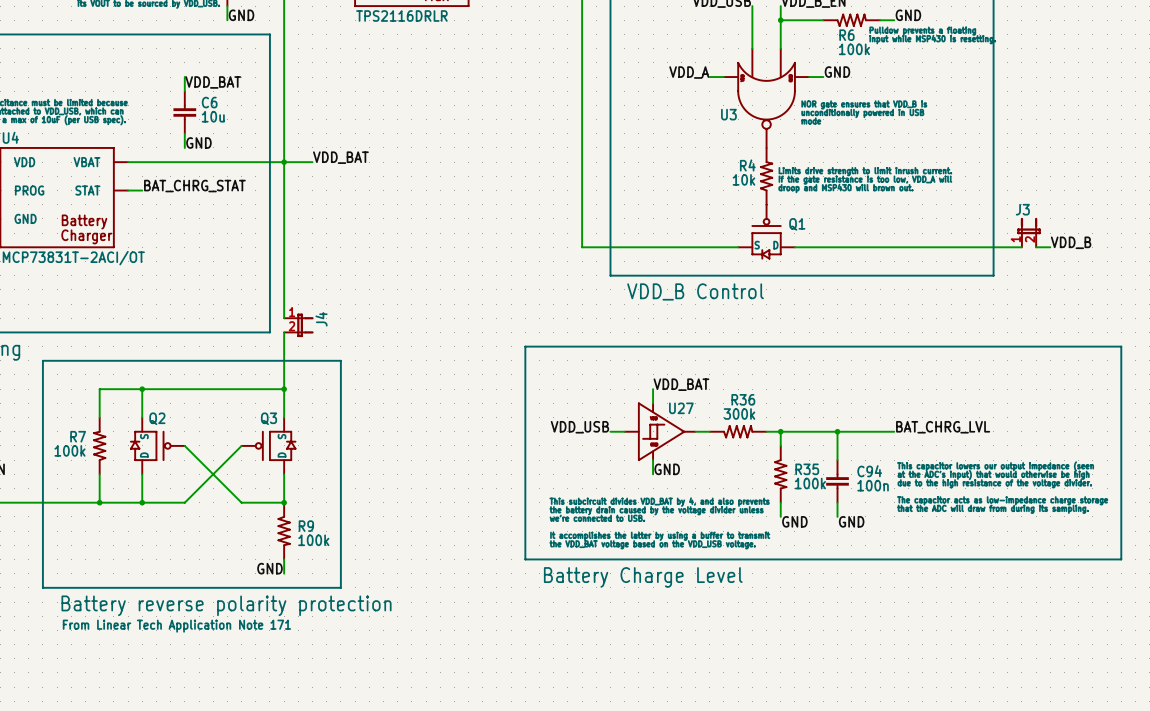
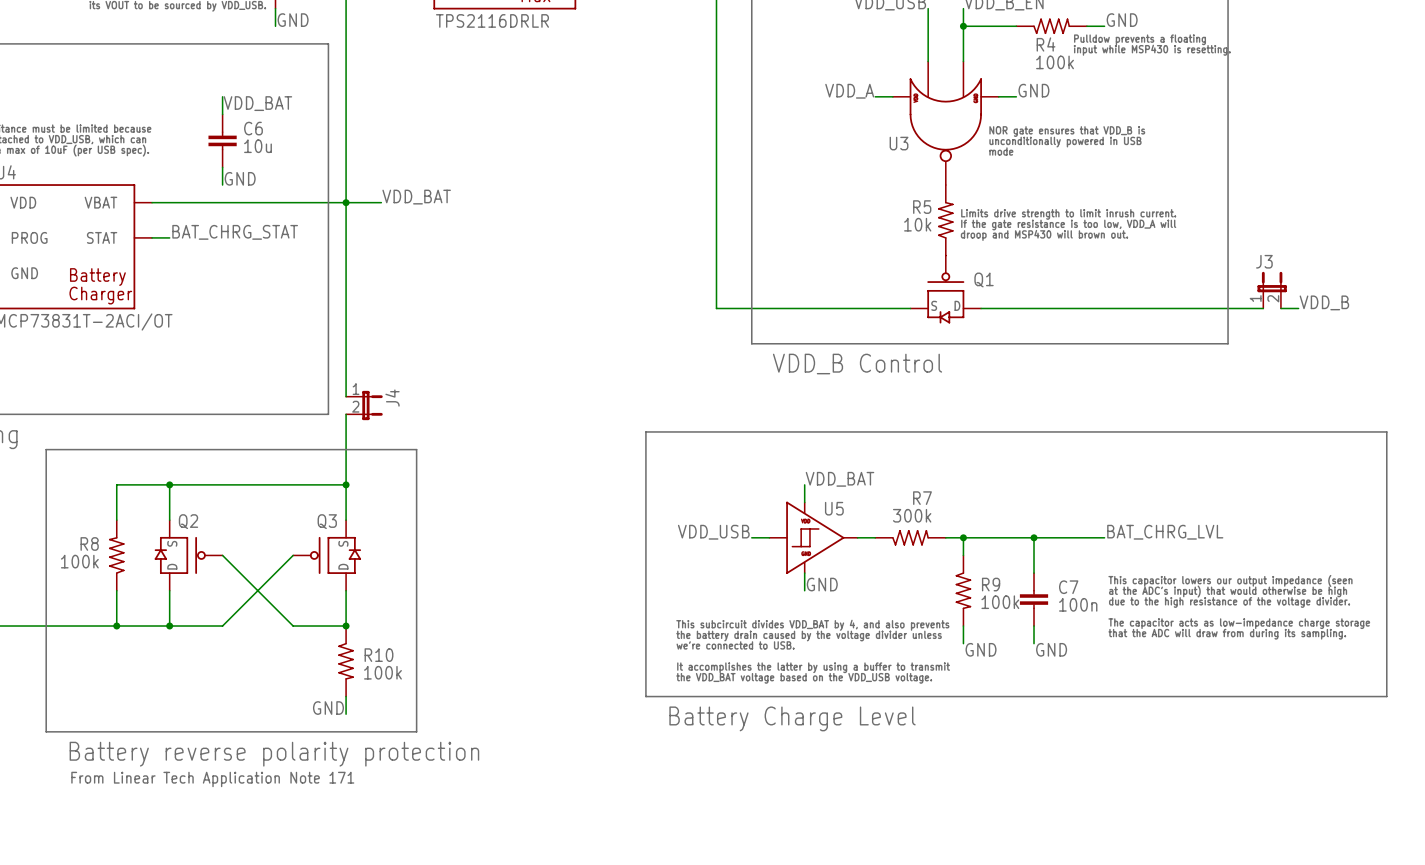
R6 name: R6 (846, 35) -> R4 (1046, 44)
R4 name: R4 (747, 165) -> R5 (922, 207)
R36 name: R36 (743, 399) -> R7 (922, 498)
U27 name: U27 (681, 408) -> U5 (834, 508)
R7 name: R7 (78, 436) -> R8 (89, 543)
R35 name: R35 (807, 469) -> R9 (991, 584)
C94 name: C94 (869, 471) -> C7 (1068, 587)
R9 name: R9 (306, 526) -> R10 (378, 655)

